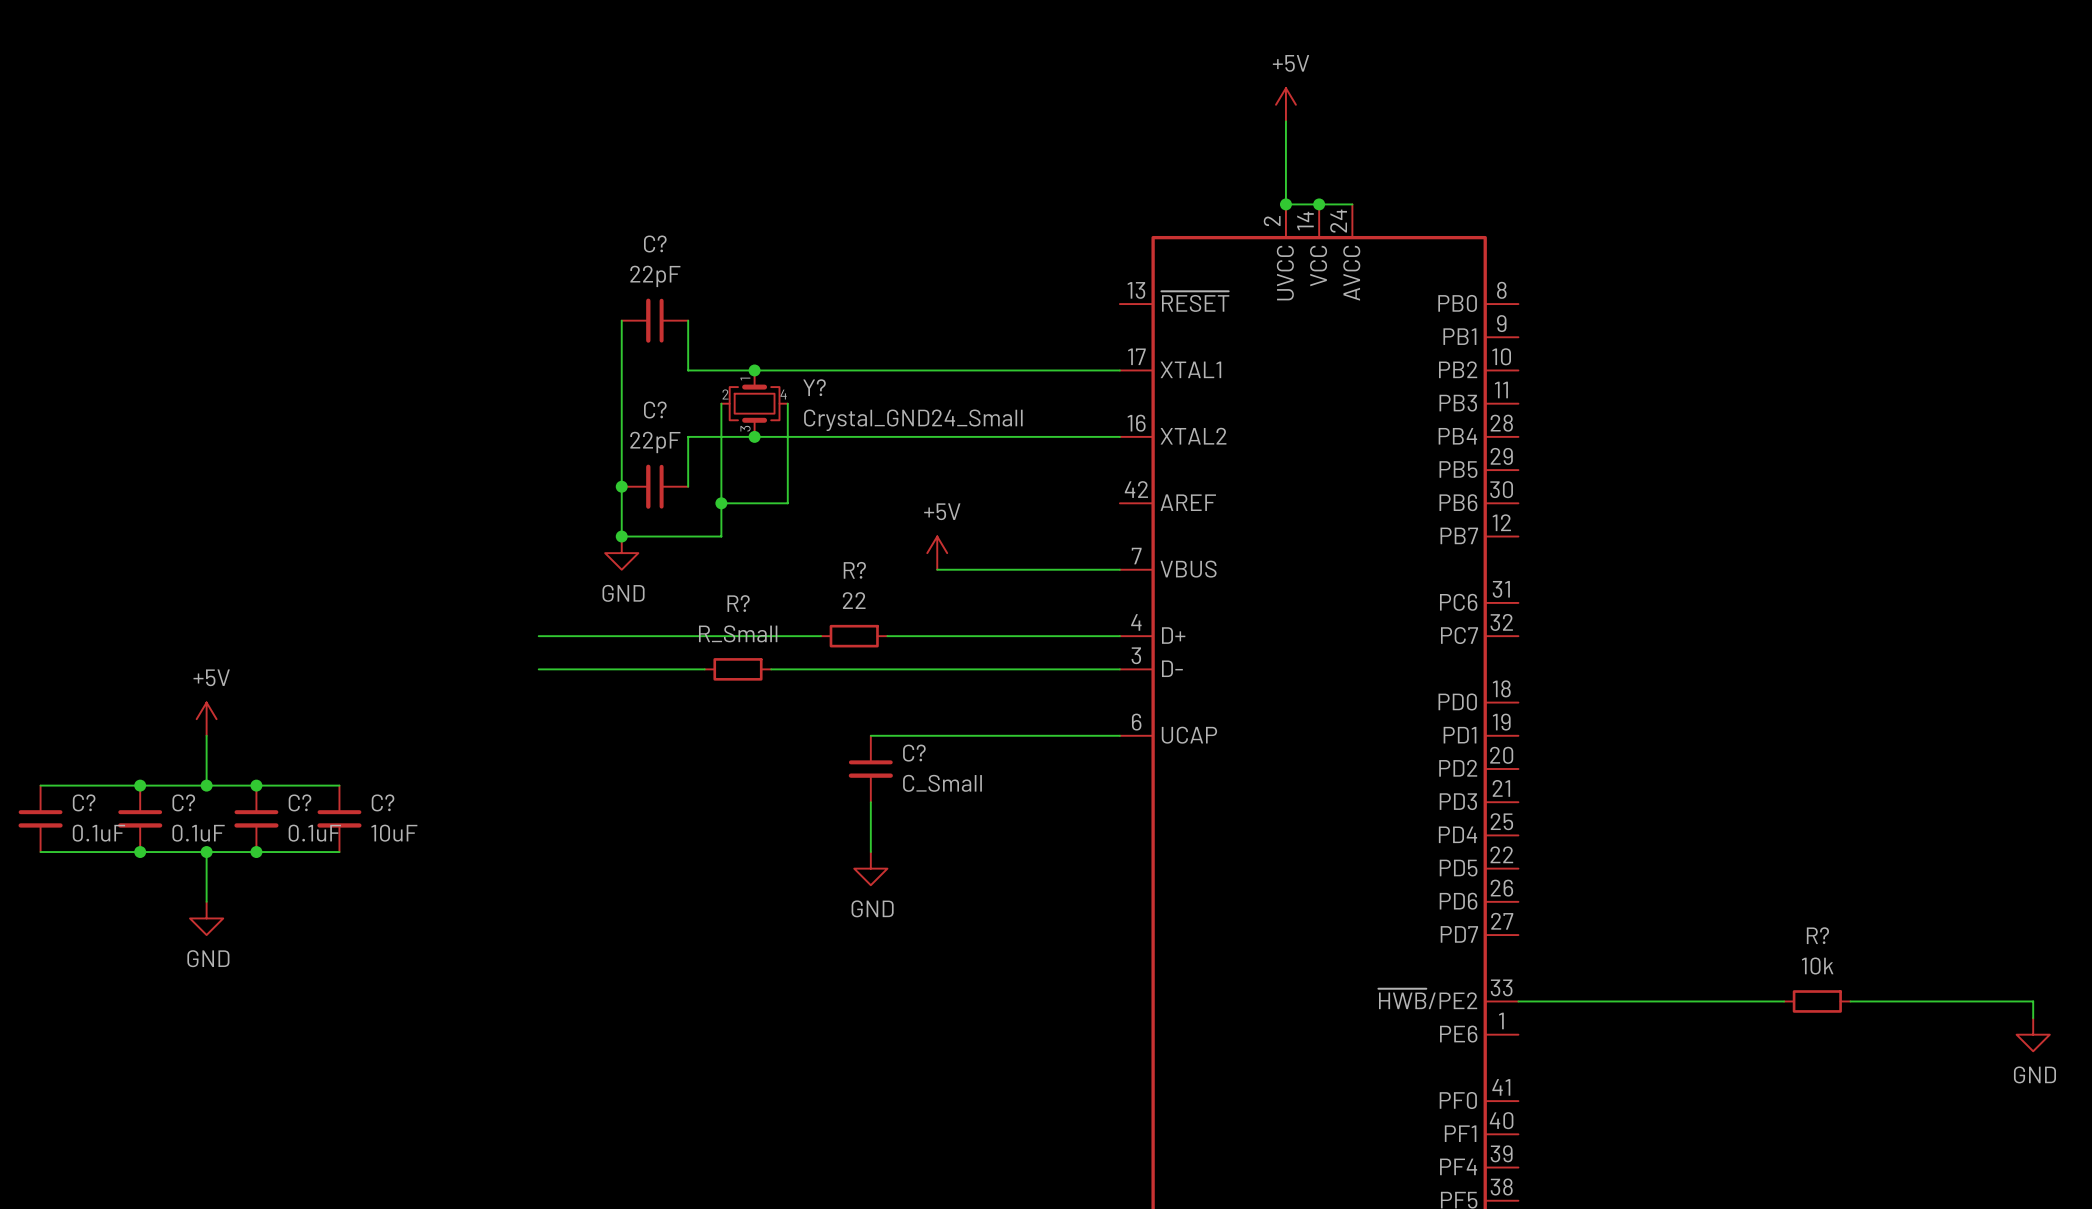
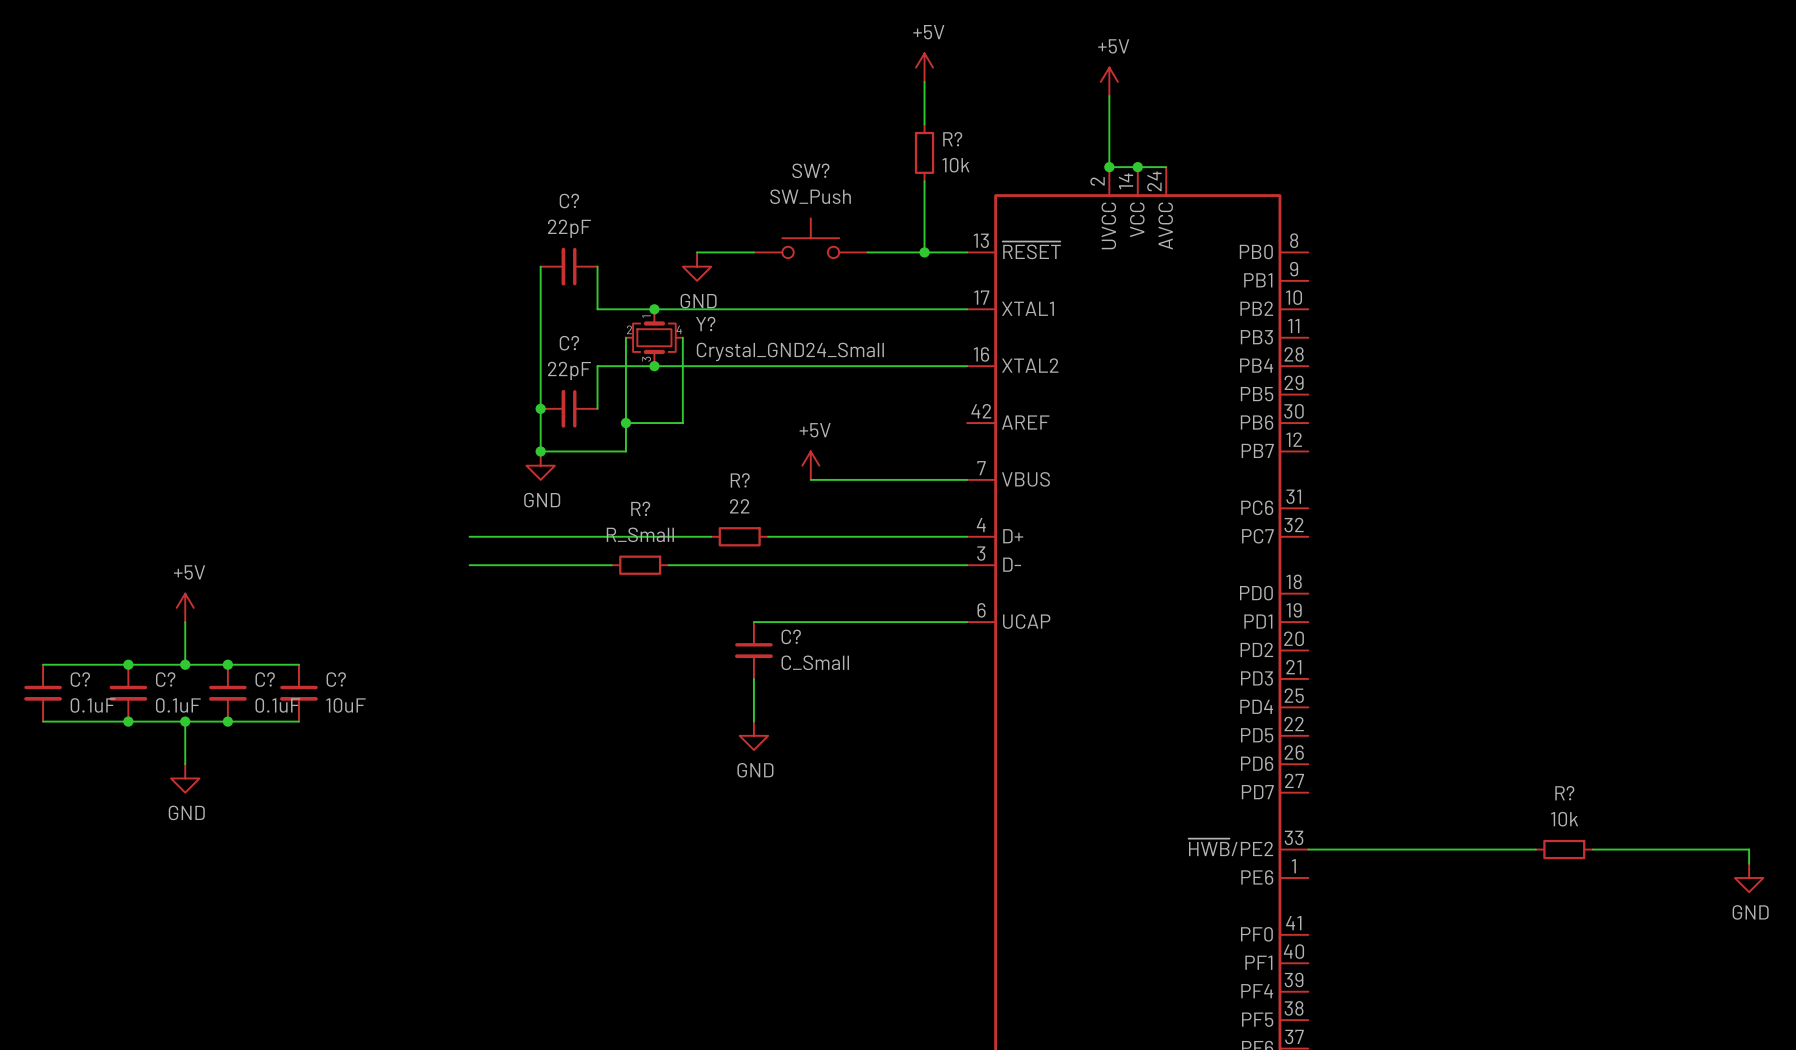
power symbol: none -> +5V (924, 67)
wire: none -> (924, 81) (924, 124)
R?: none -> 10k (924, 152)
wire: none -> (924, 181) (924, 252)
SW?: none -> SW_Push (810, 238)
wire: none -> (697, 252) (753, 252)
wire: none -> (867, 252) (967, 252)
junction: none -> (924, 252)
power symbol: none -> GND (697, 266)

